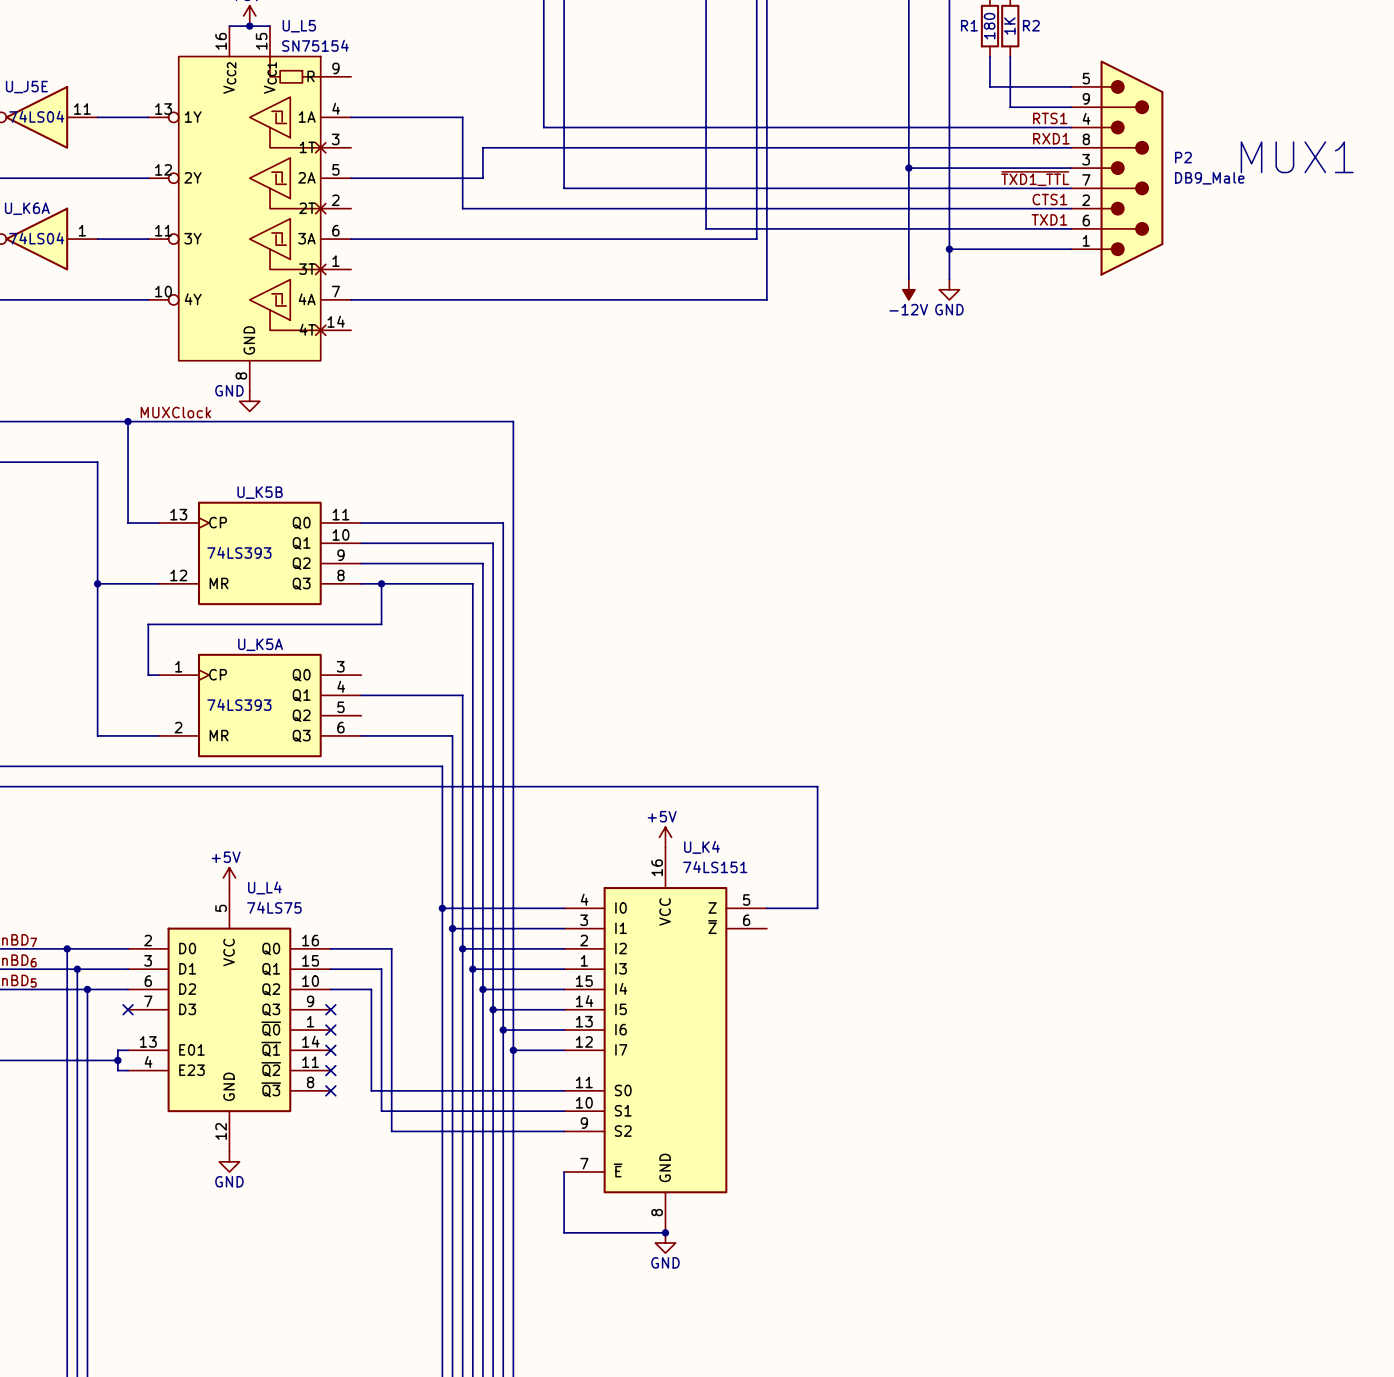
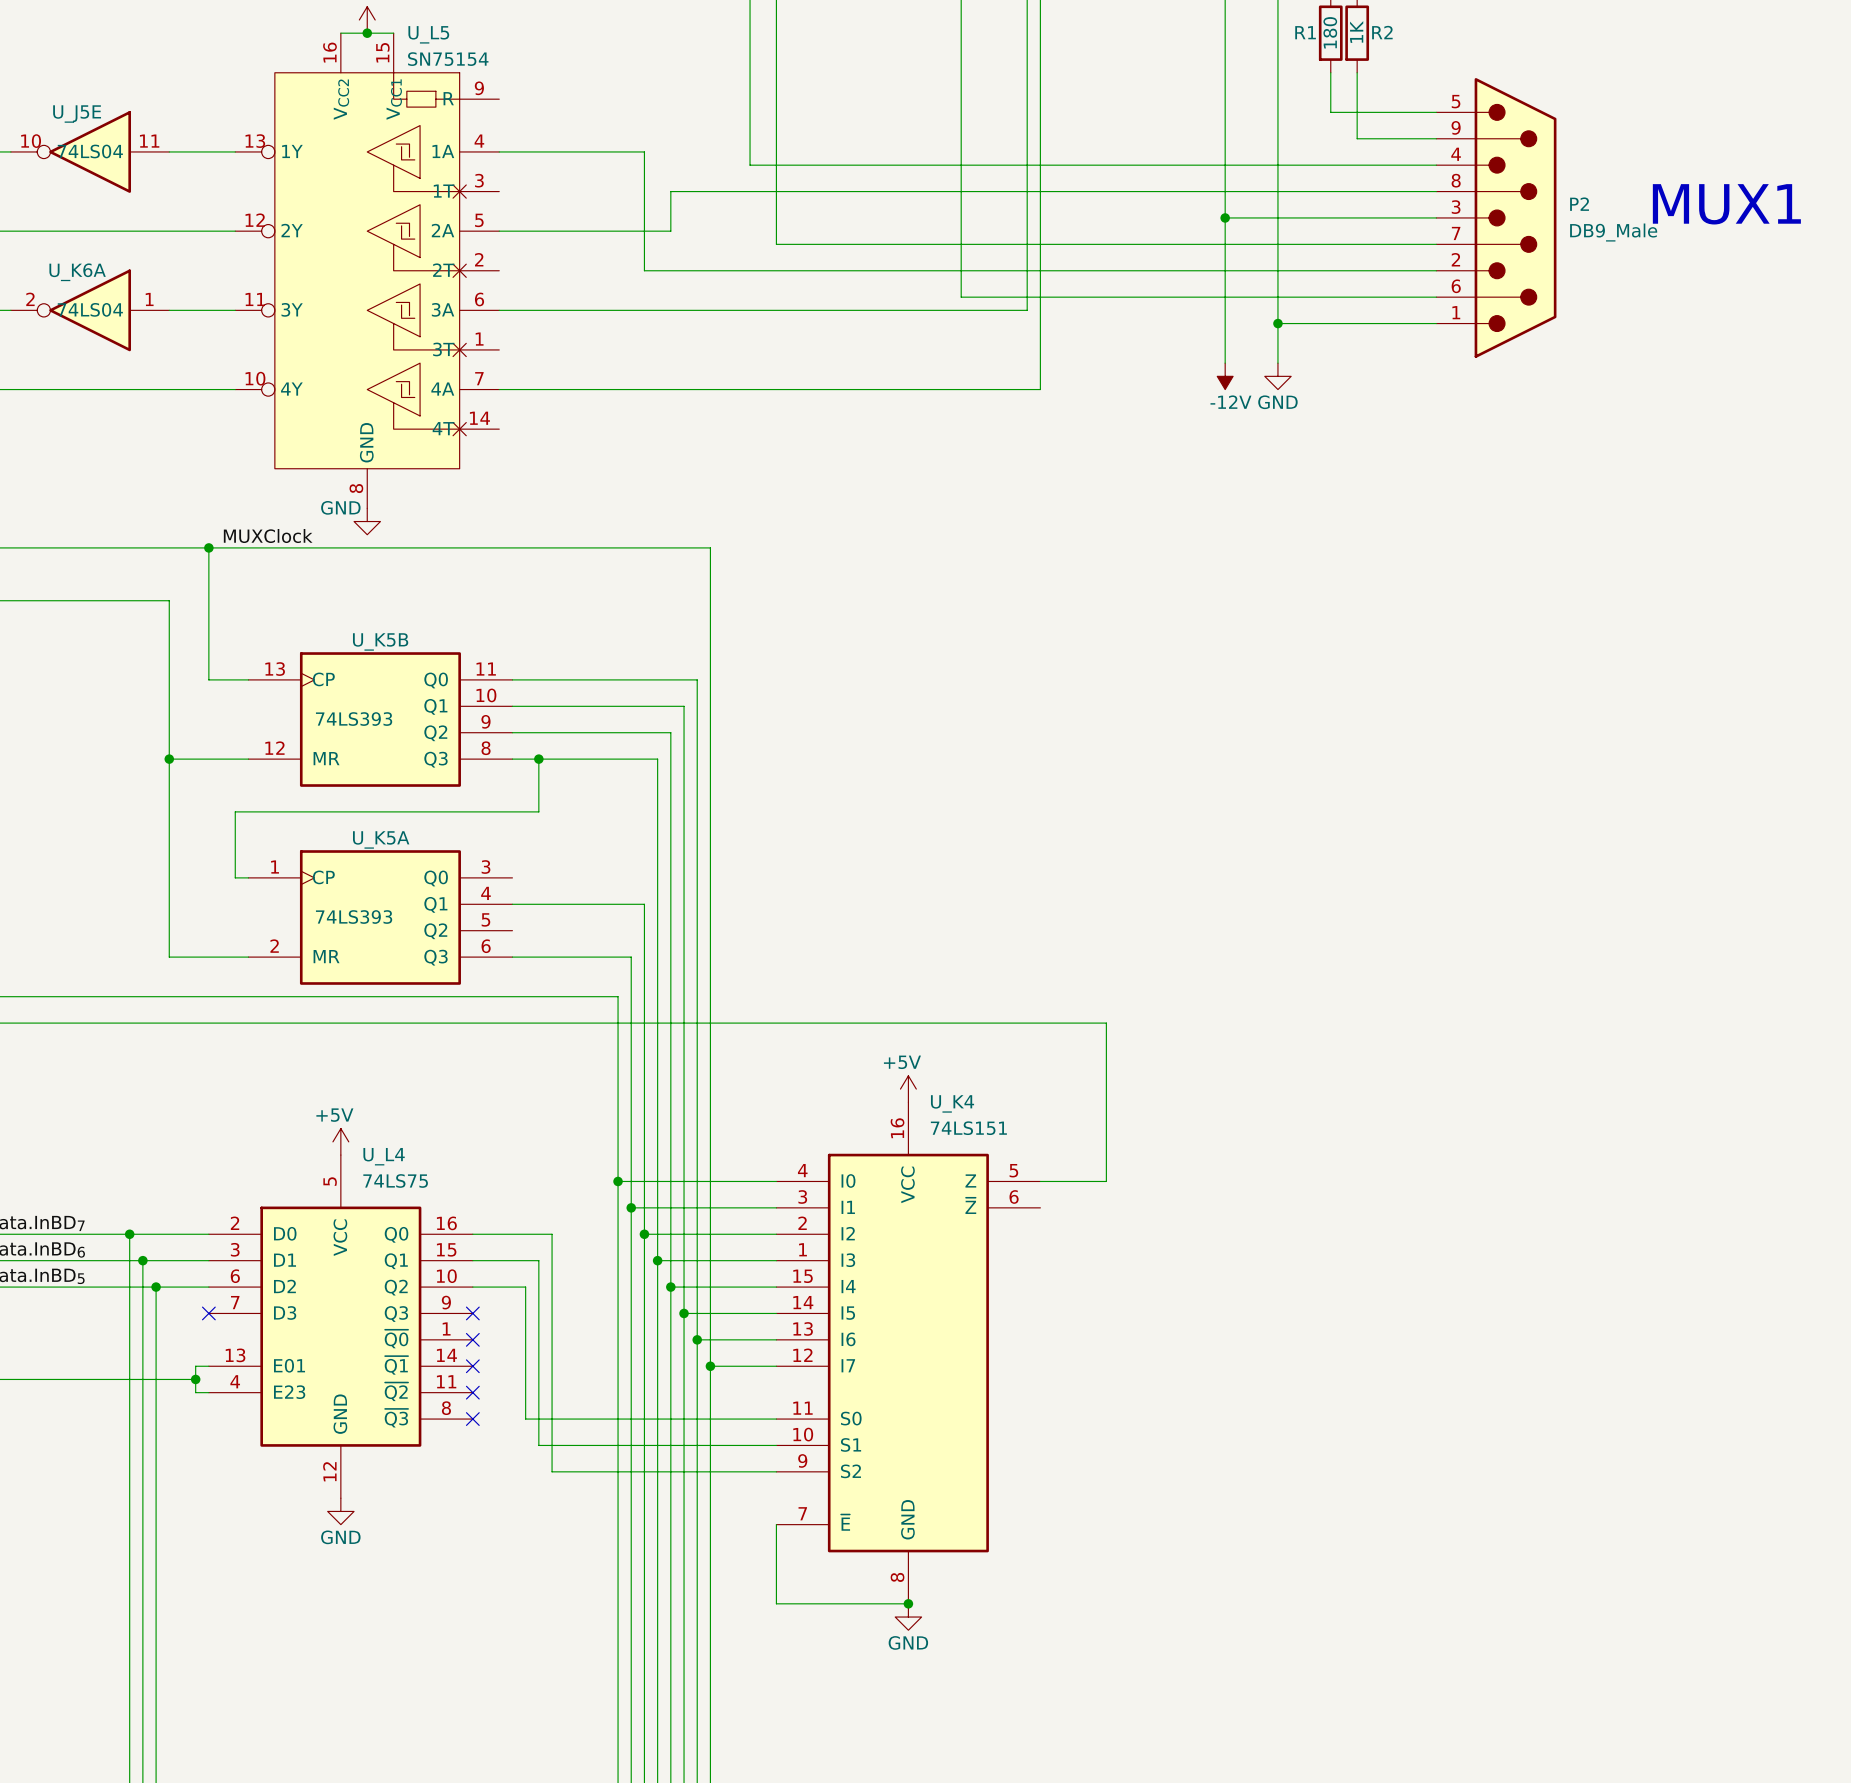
label: RTS1 (1050, 118) -> none
label: RXD1 (1051, 138) -> none
label: ~{TXD1_TTL} (1035, 178) -> none
label: CTS1 (1049, 199) -> none
label: TXD1 (1049, 219) -> none

